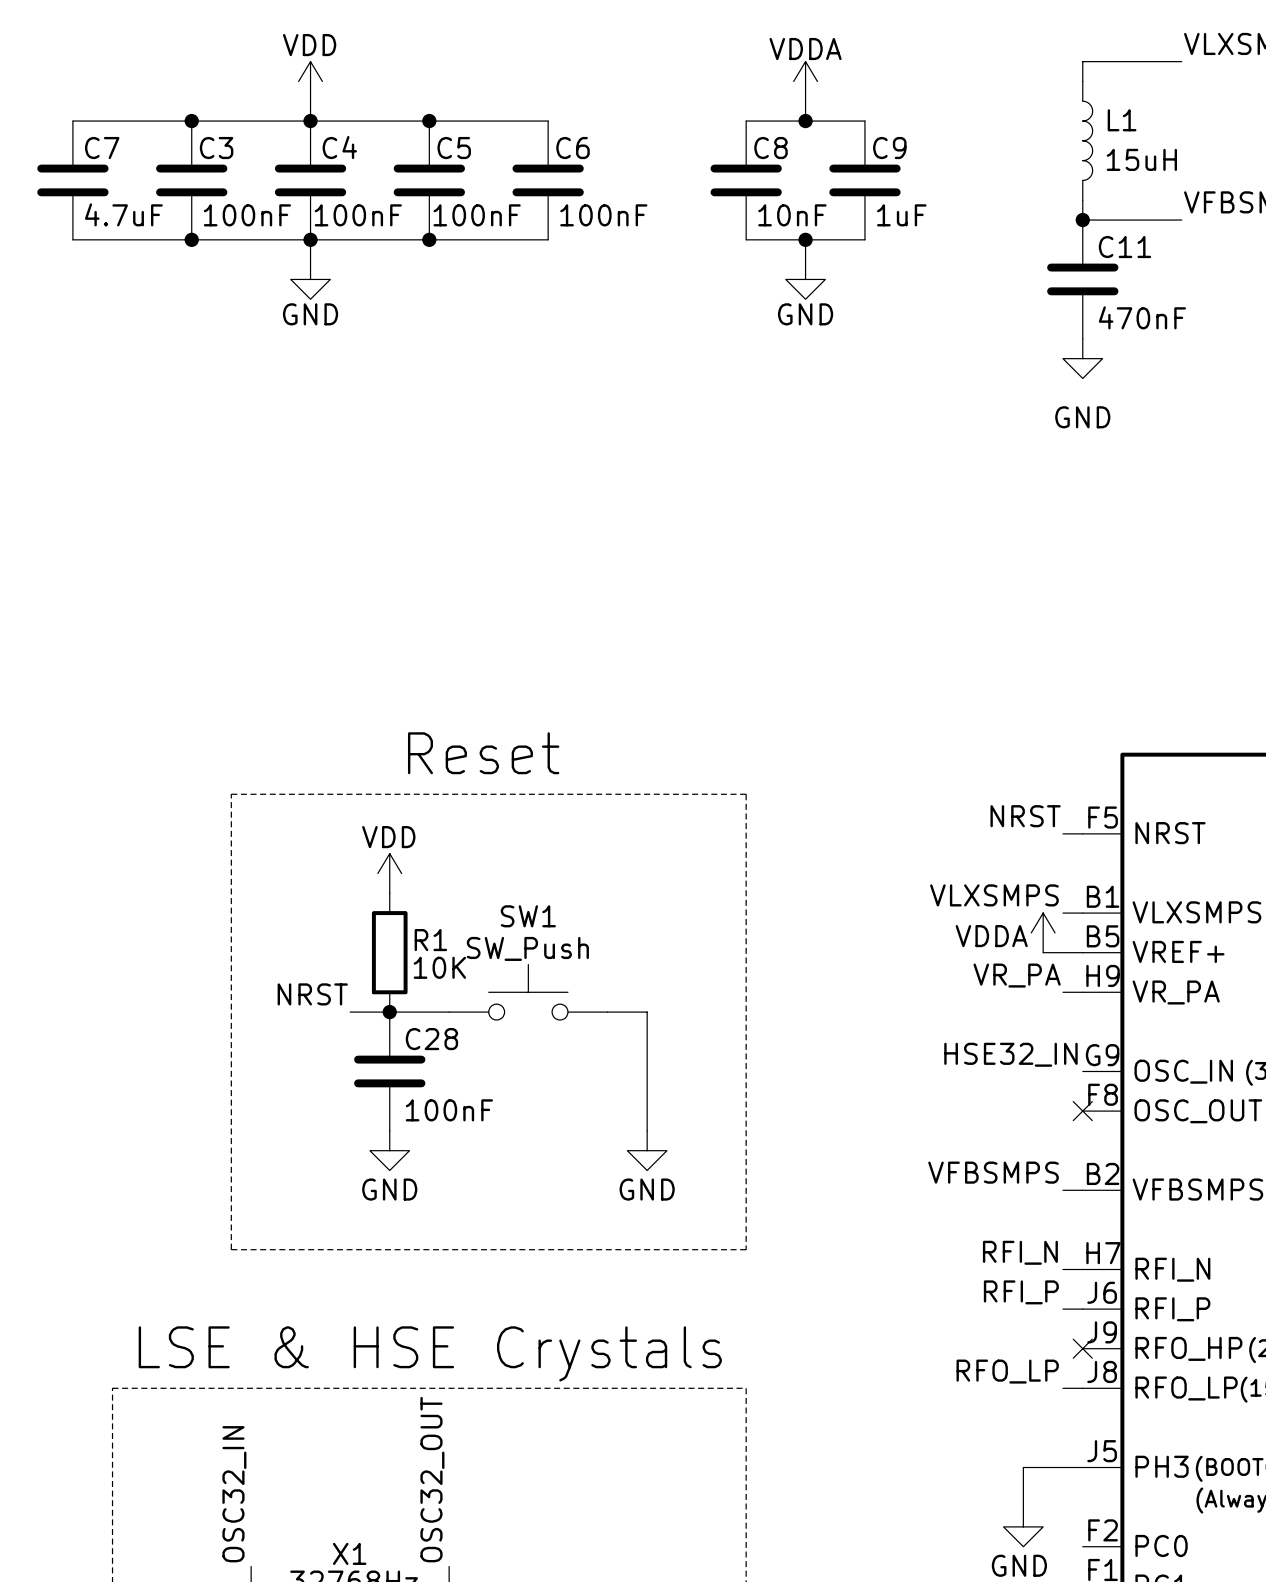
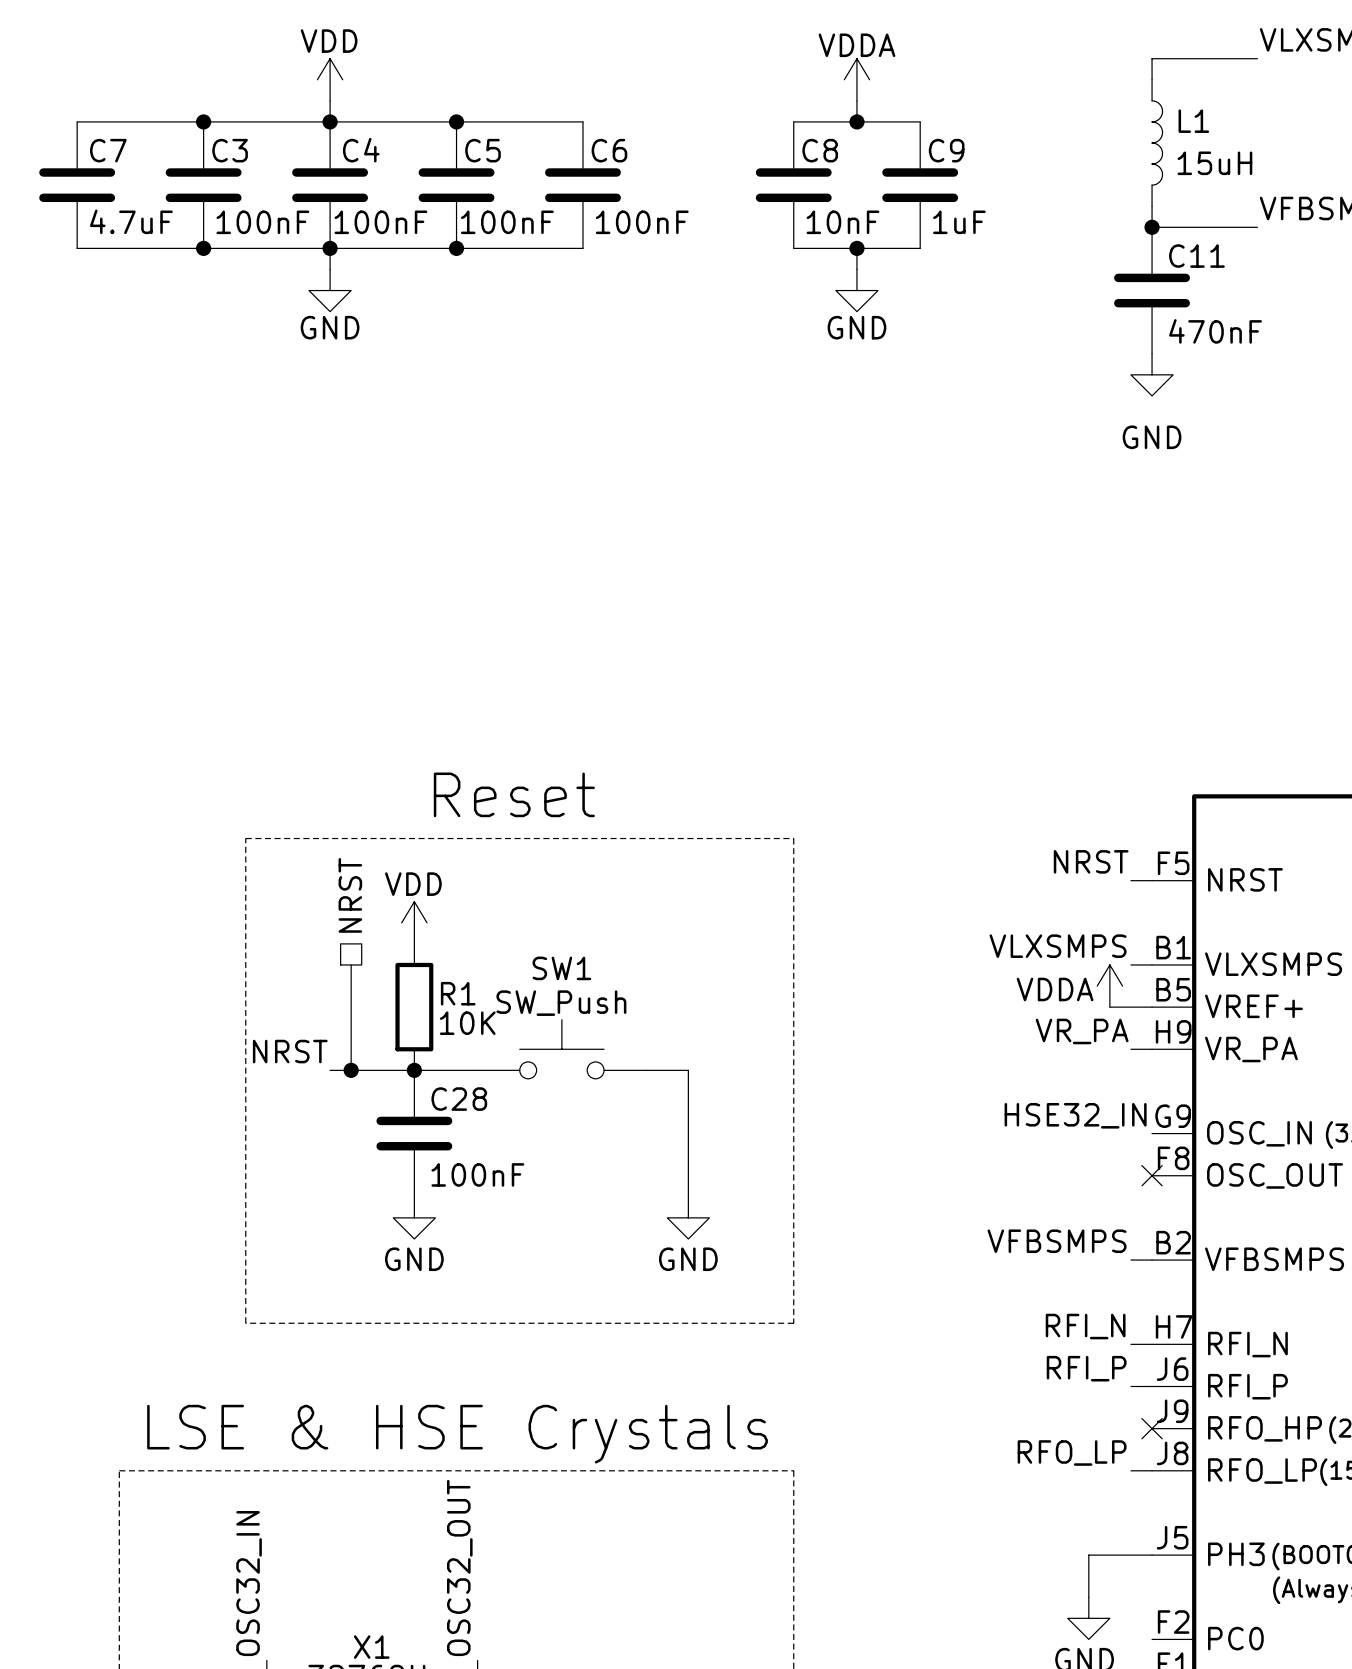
hierarchical label: none -> NRST (350, 895)
wire: none -> (351, 964) (351, 1070)
label position: NRST (312, 994) -> NRST (290, 1051)
wire: none -> (330, 1070) (372, 1070)
junction: none -> (351, 1070)

